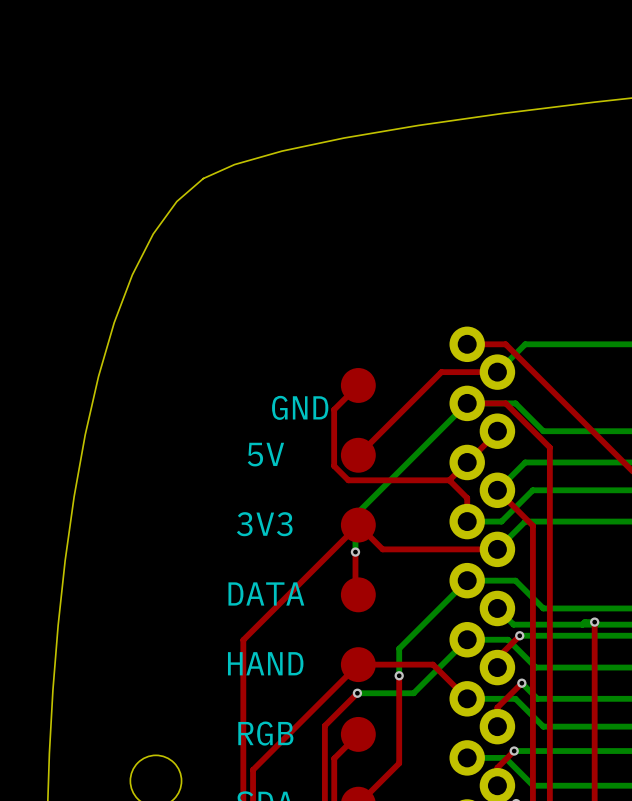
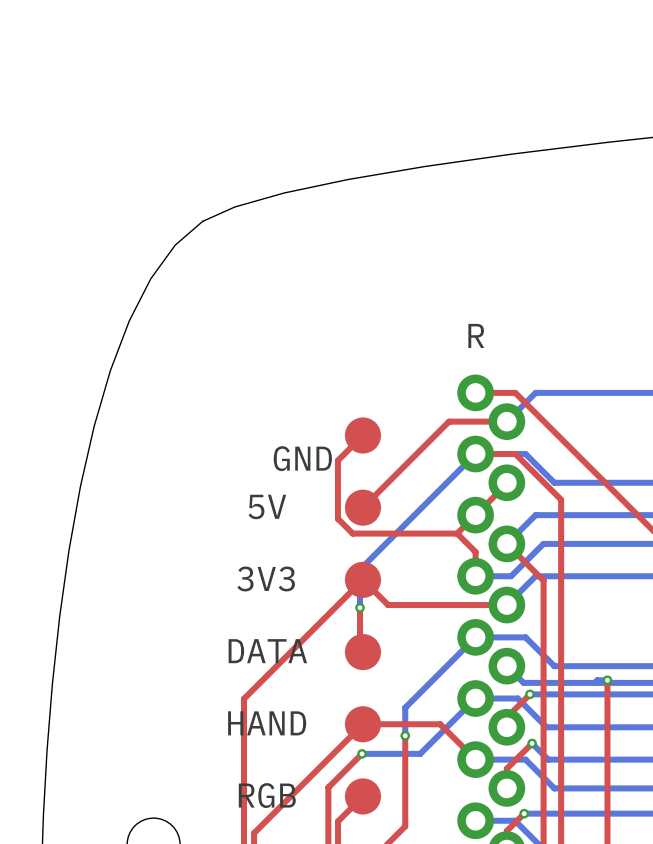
text: none -> R (476, 335)

